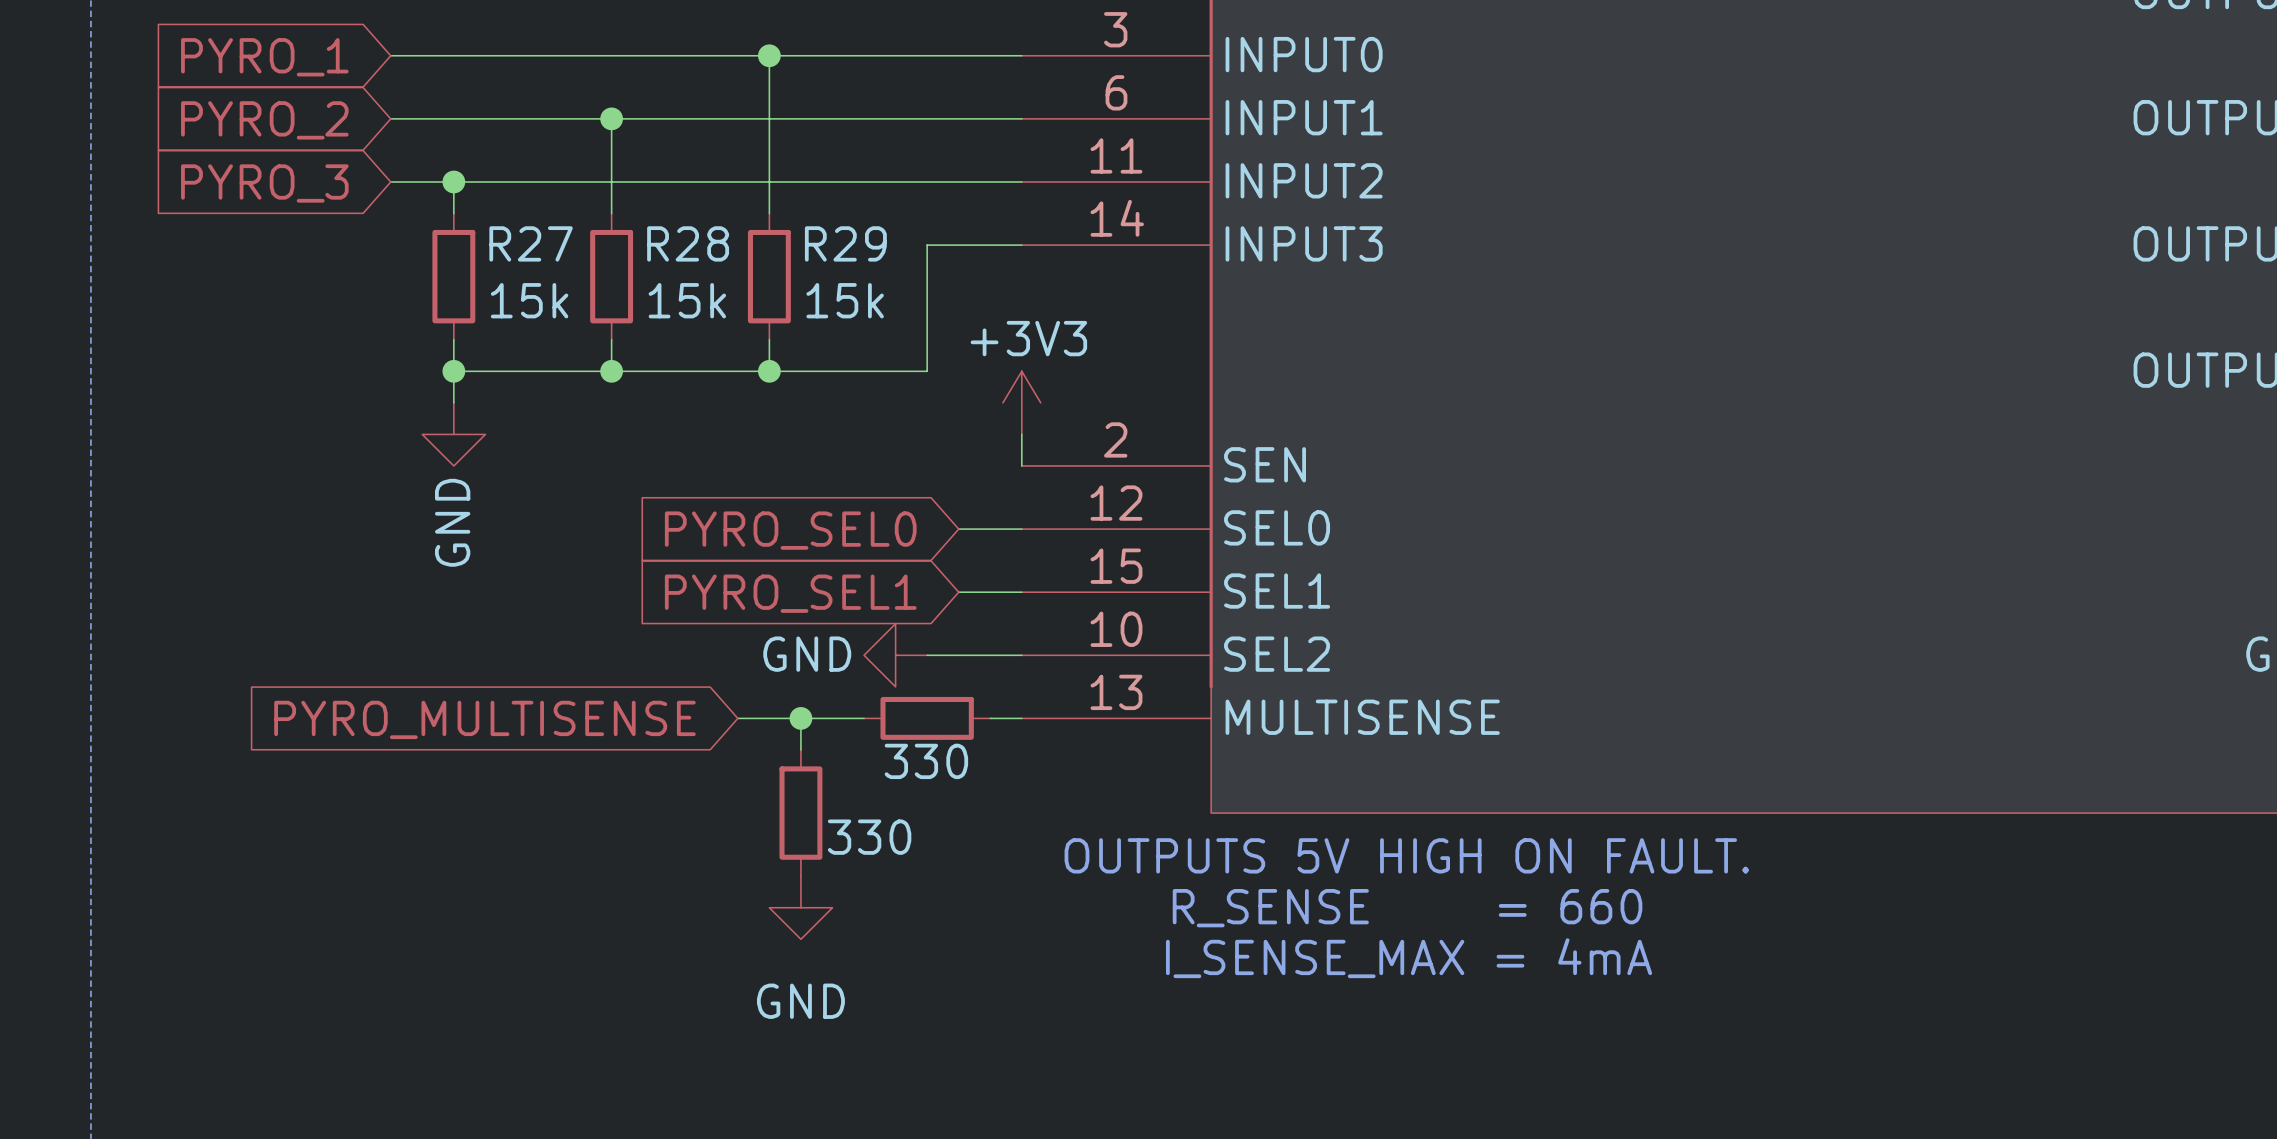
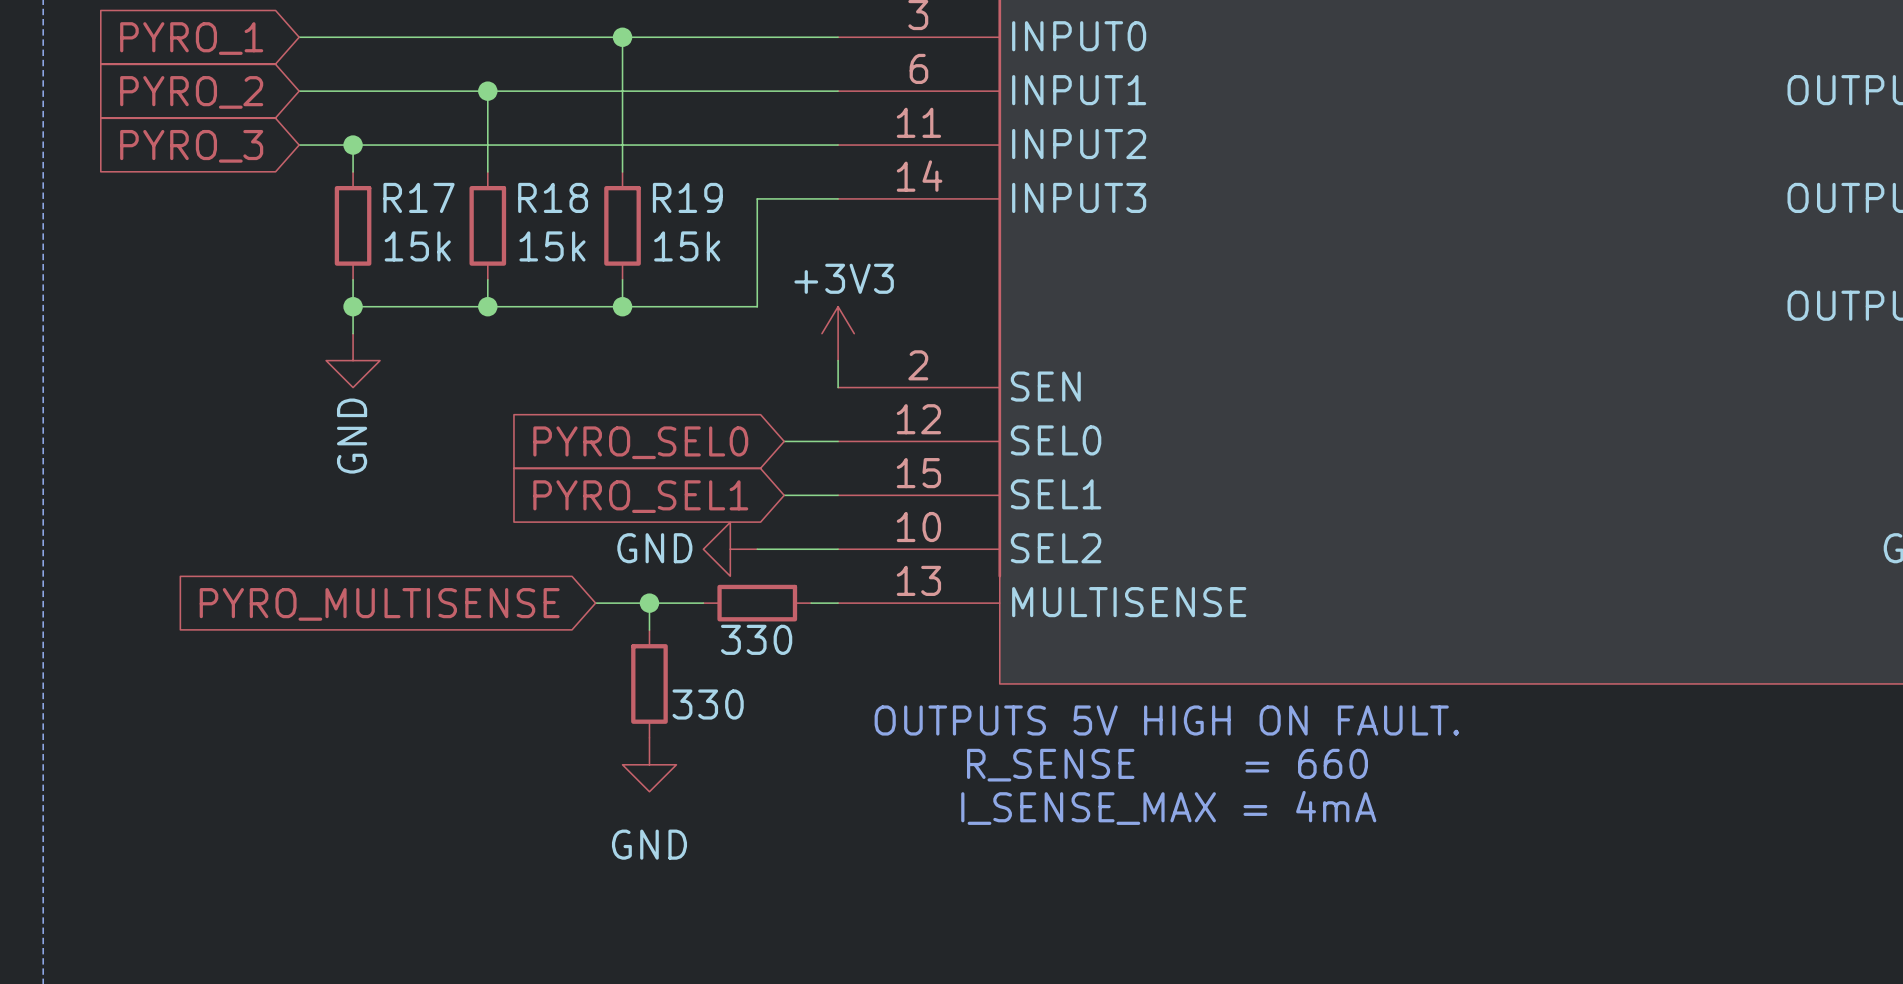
R27 name: R27 (531, 243) -> R17 (419, 197)
R28 name: R28 (688, 243) -> R18 (553, 197)
R29 name: R29 (845, 243) -> R19 (687, 197)

